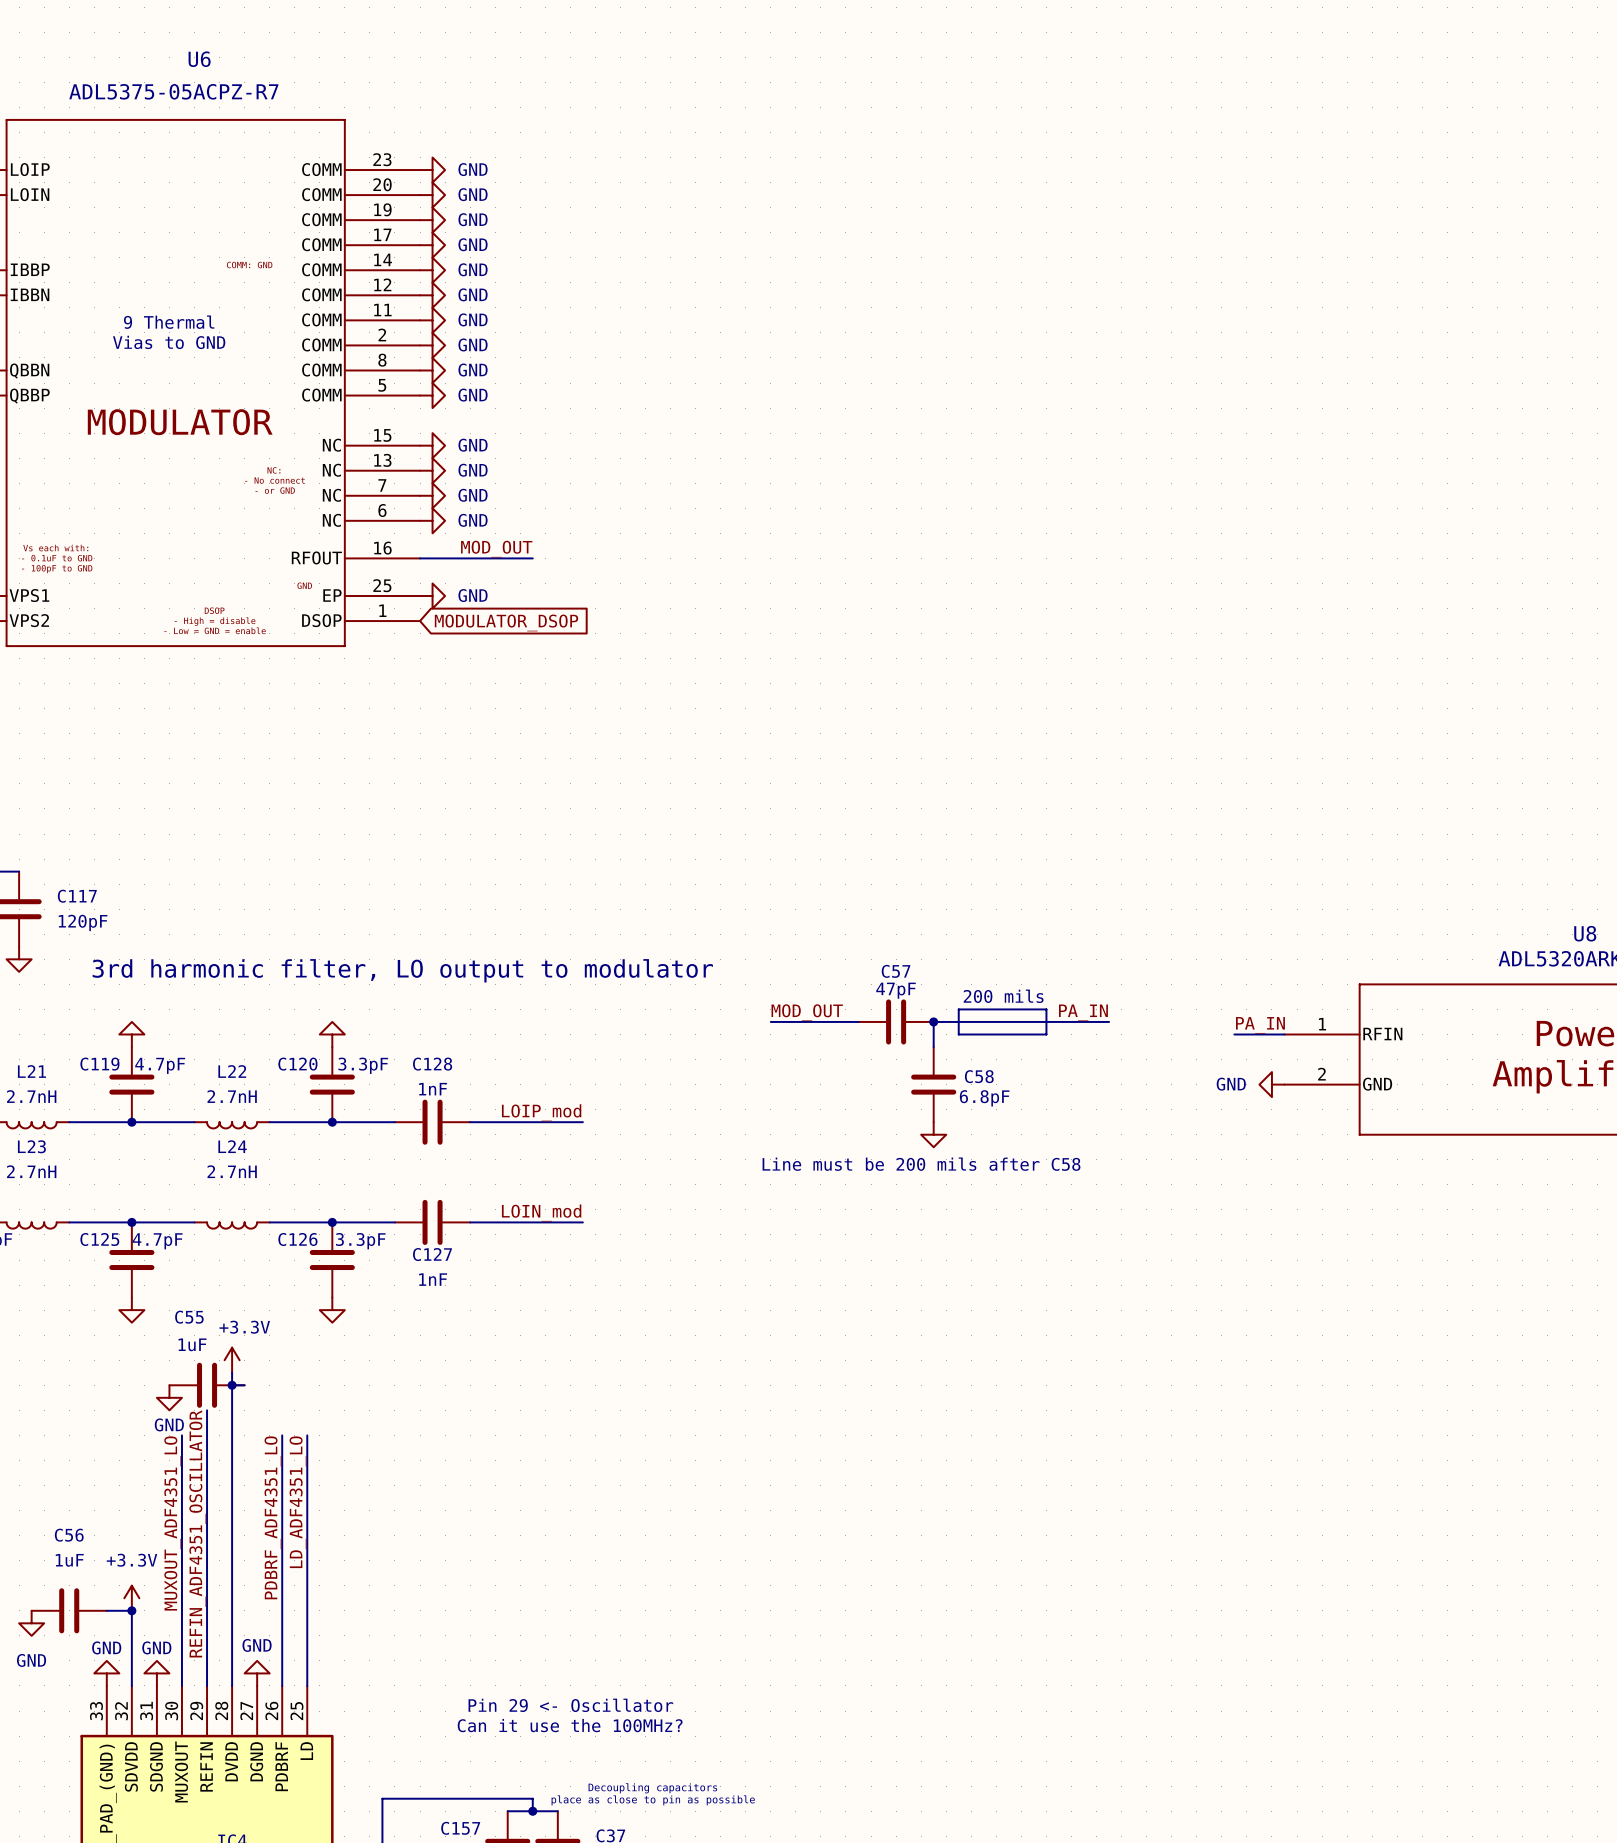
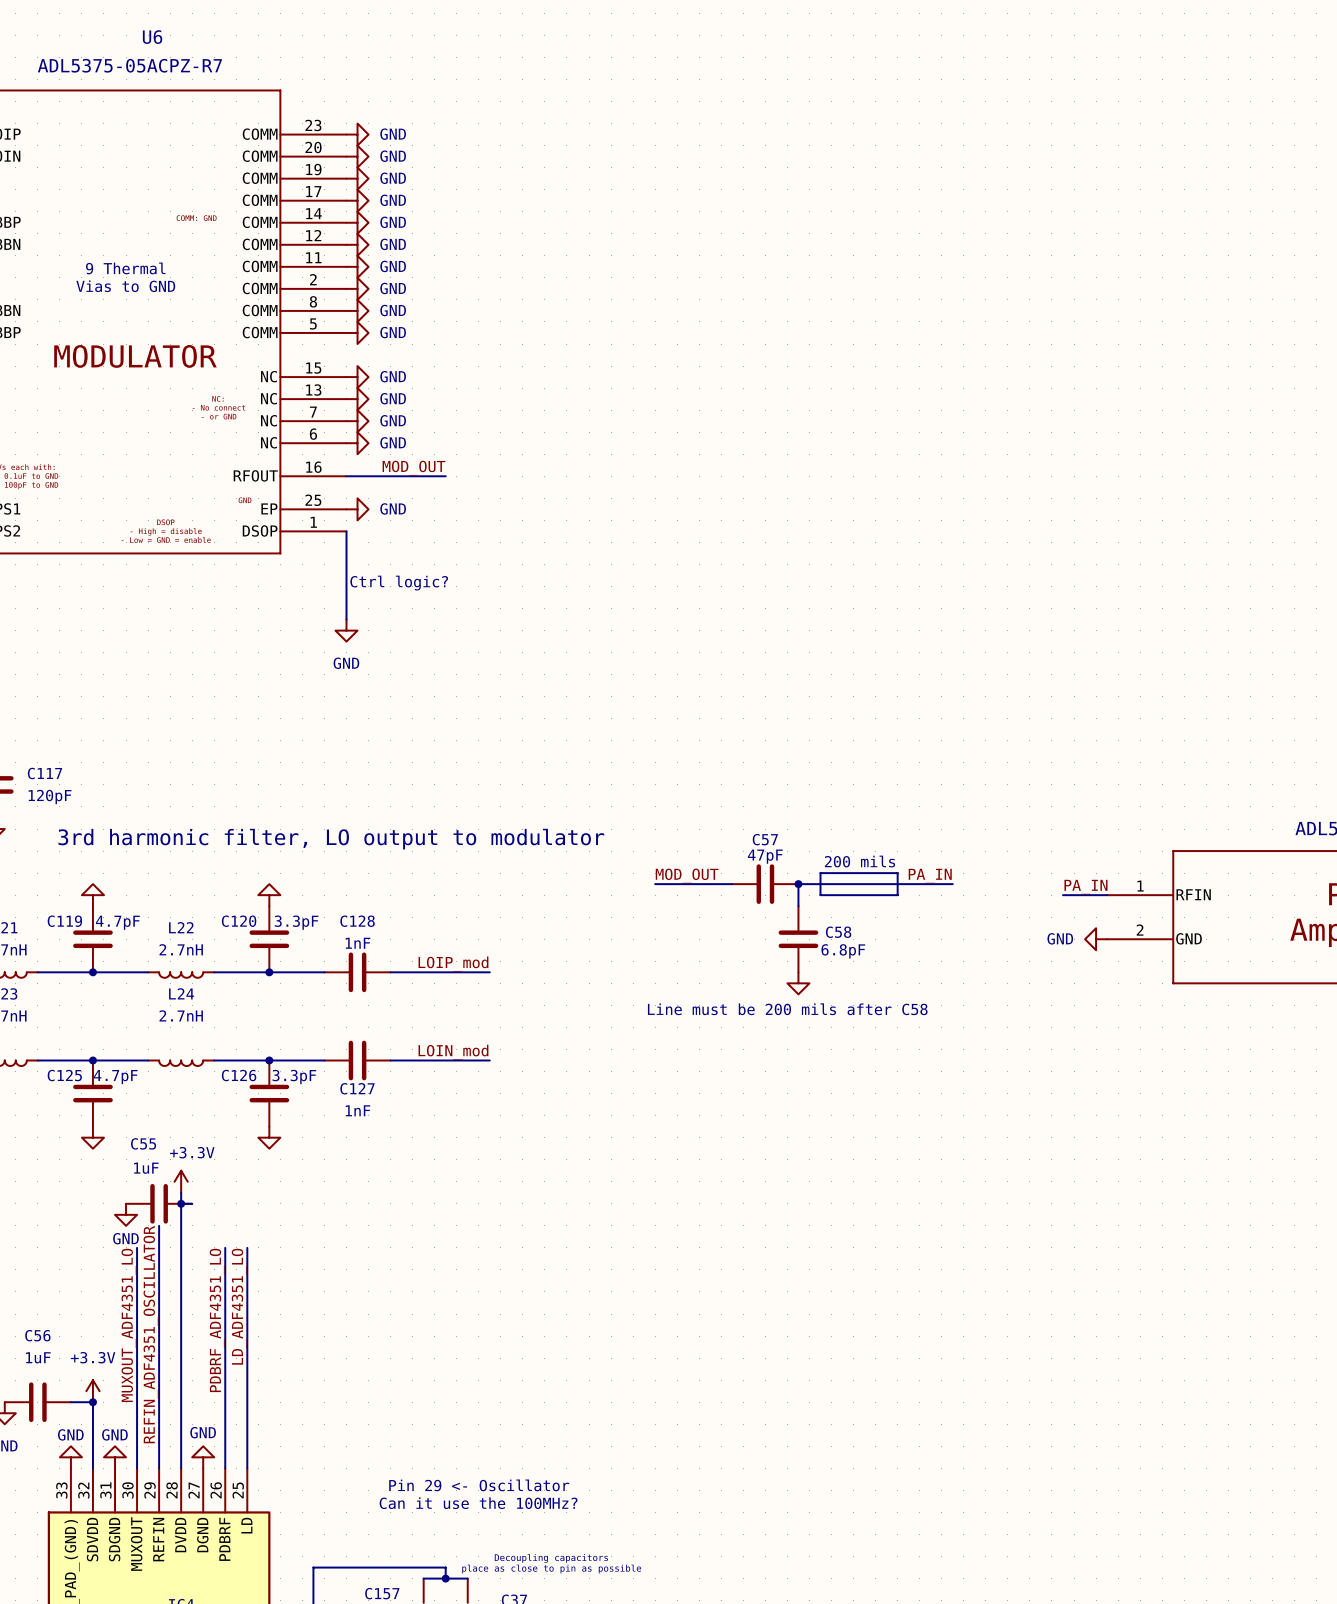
wire: none -> (346, 531) (346, 619)
global label: MODULATOR_DSOP (506, 622) -> none
text: none -> Ctrl logic? (399, 583)
power symbol: none -> GND (346, 630)

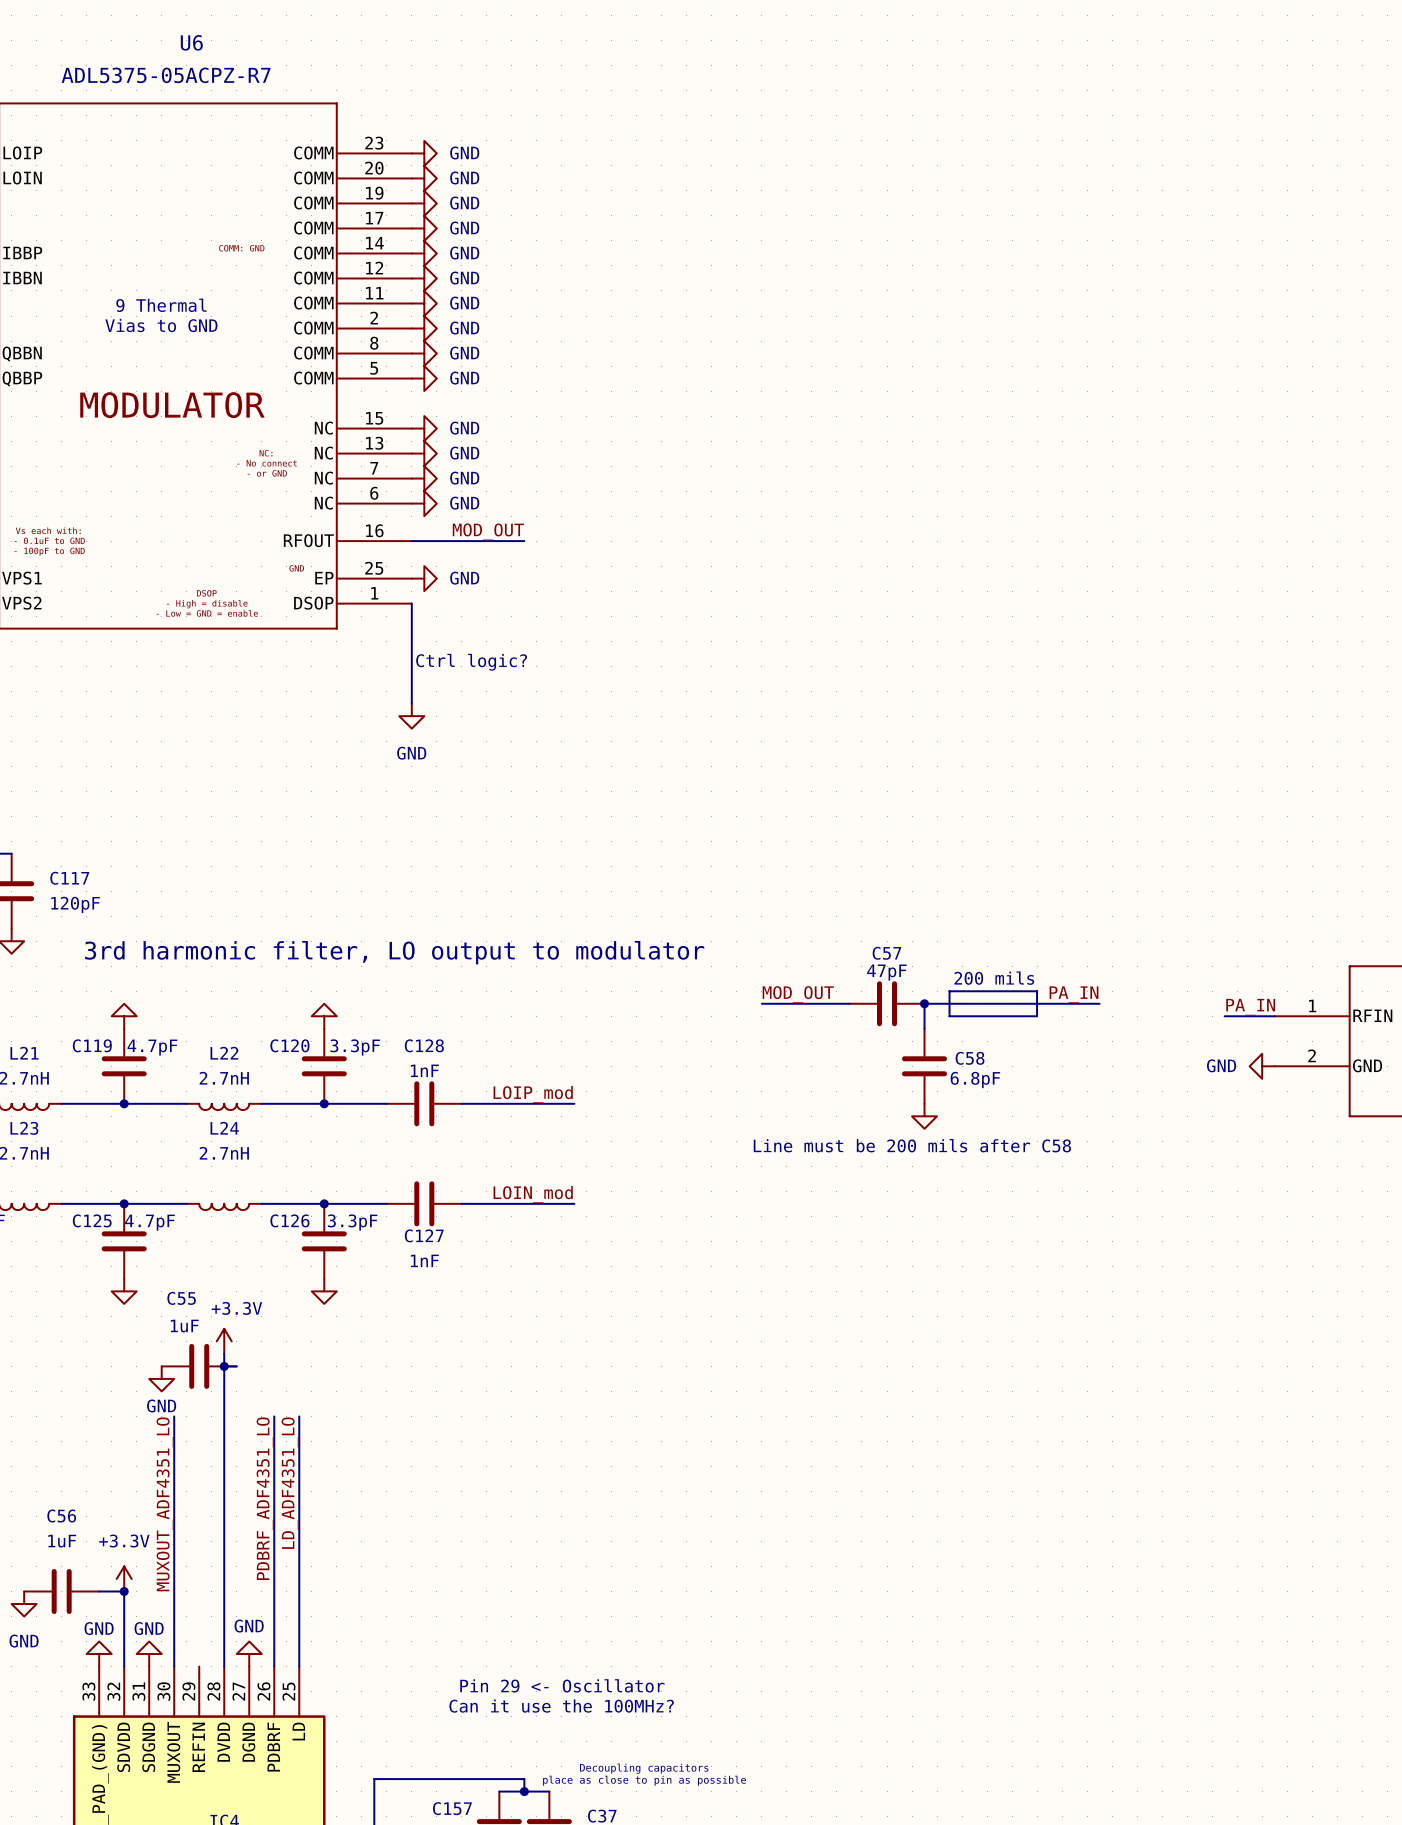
wire: (159, 1225) (159, 1468) -> none
label: REFIN_ADF4351_OSCILLATOR (150, 1334) -> none

